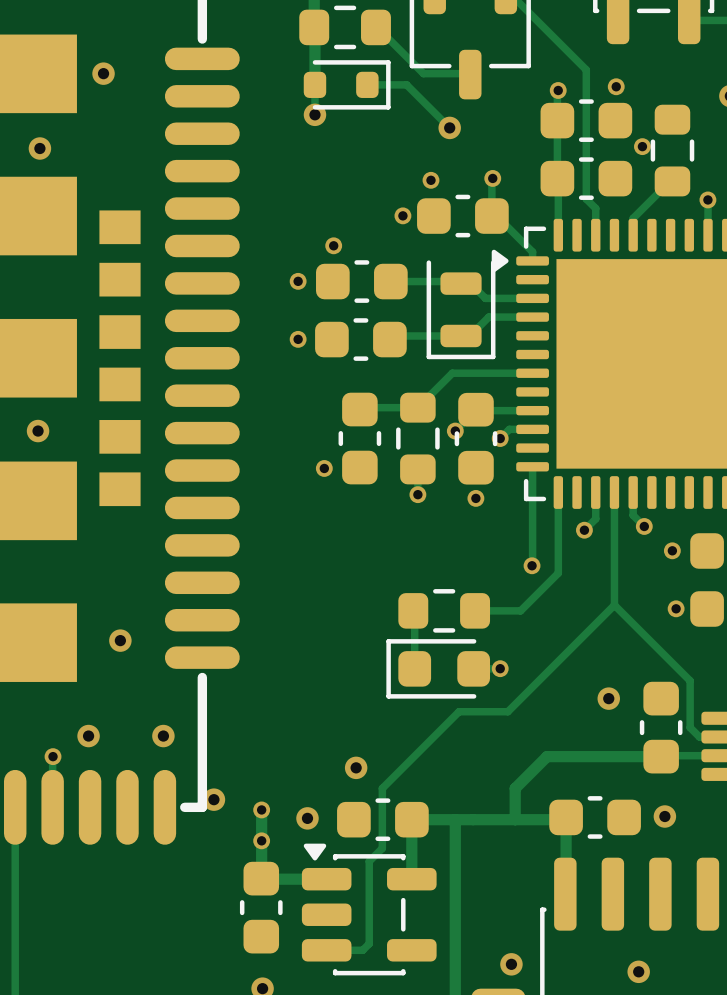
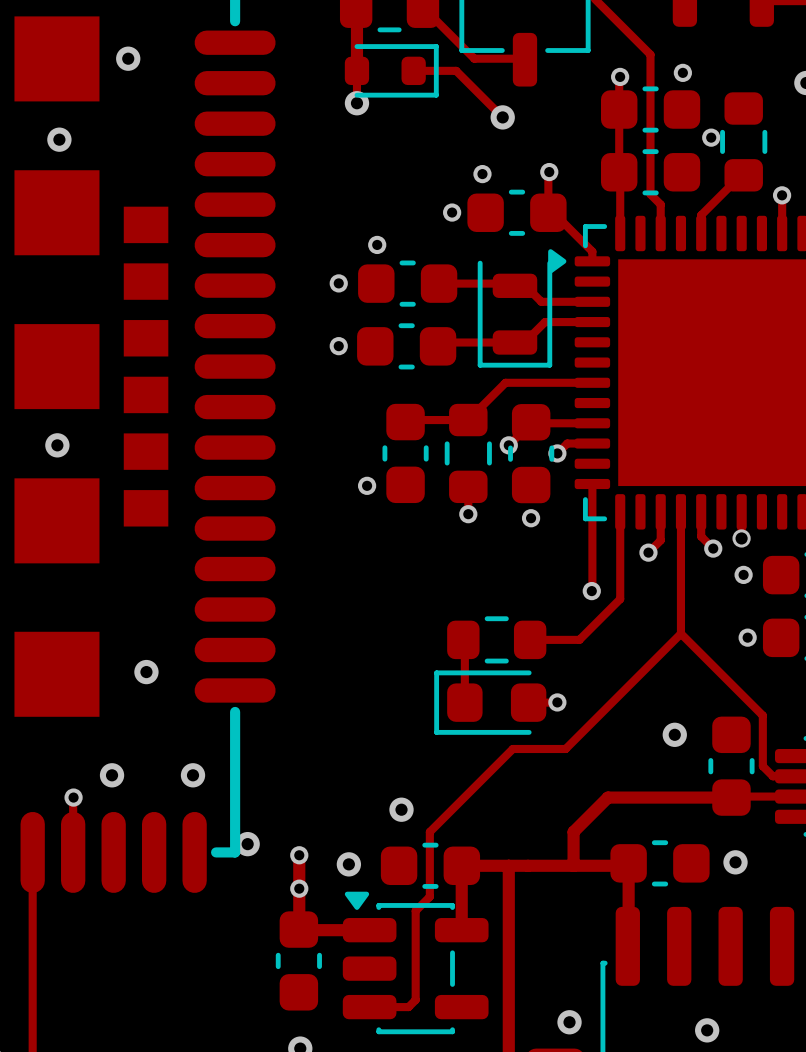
via: none -> (741, 538)

